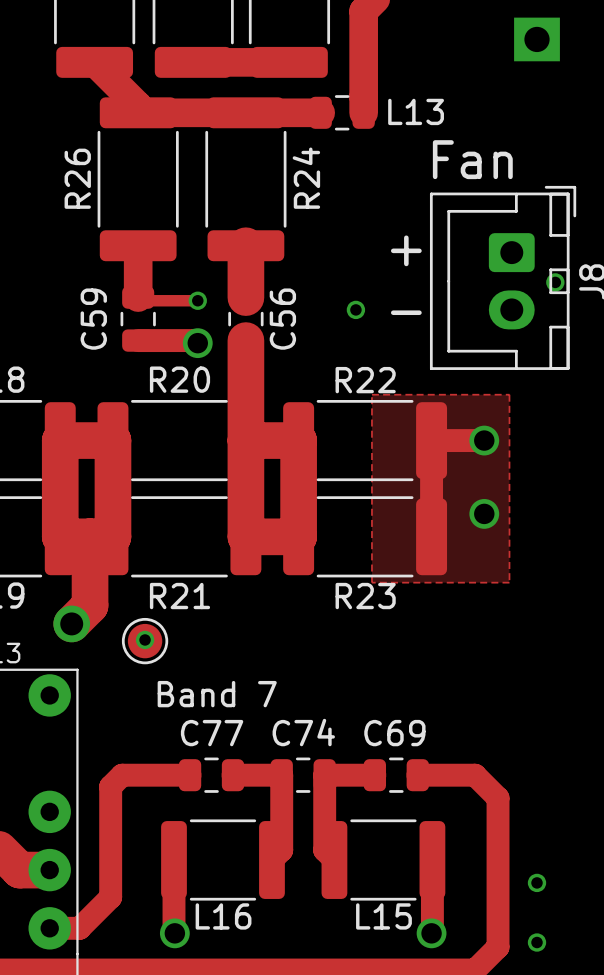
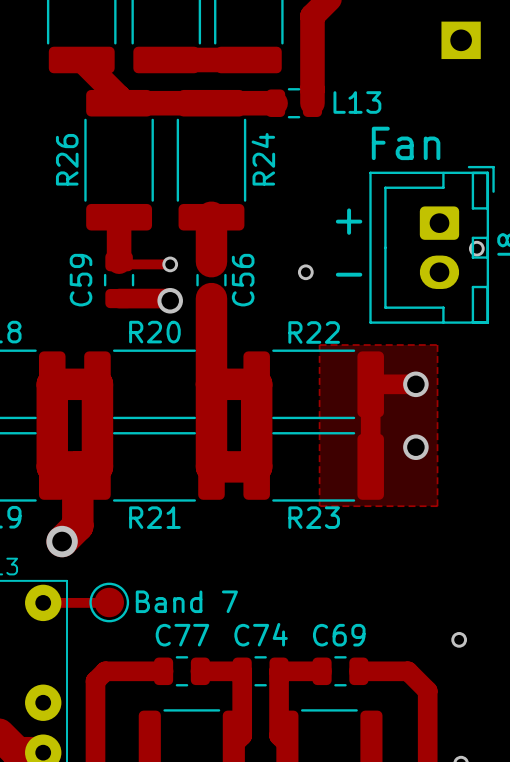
via: (145, 639) -> none
part position: (145, 641) -> (109, 602)
track: none -> (109, 602) (43, 602)
via: none -> (459, 639)

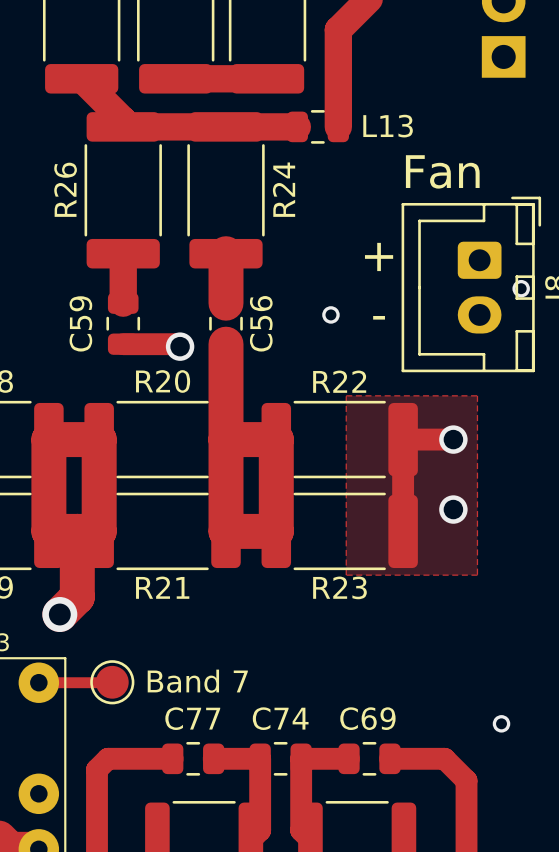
track: (119, 261) (121, 264) (170, 264) -> none
via: (170, 264) -> none

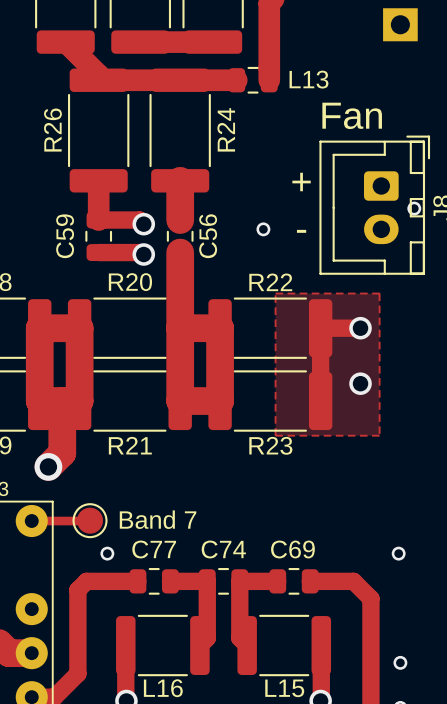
track: none -> (98, 220) (139, 220) (143, 224)
via: none -> (143, 224)
via: none -> (107, 553)

